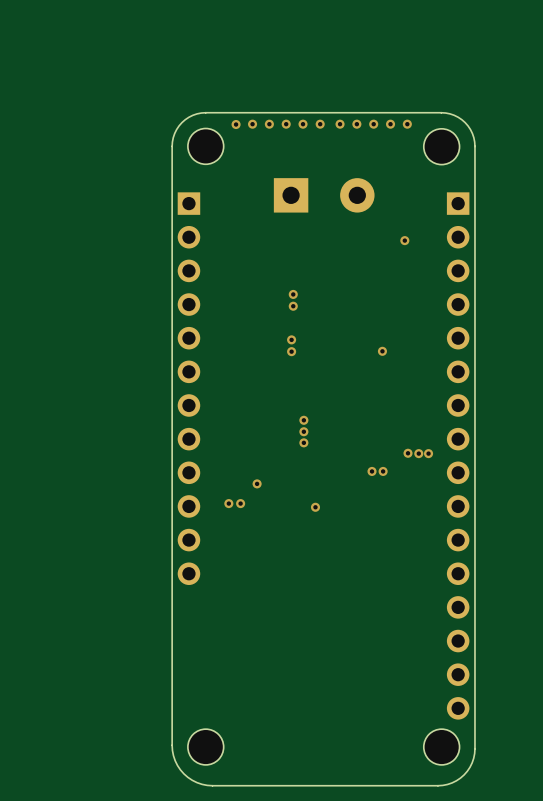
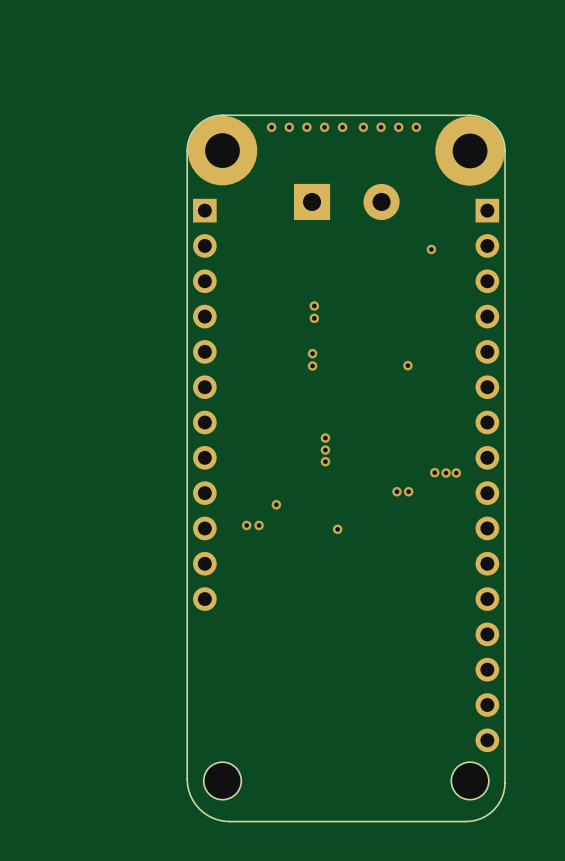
via: (236, 124) -> none
via: (407, 124) -> none
part footprint: [187, 128, 224, 165] -> [187, 115, 258, 186]
part footprint: [423, 128, 460, 165] -> [435, 116, 505, 186]

